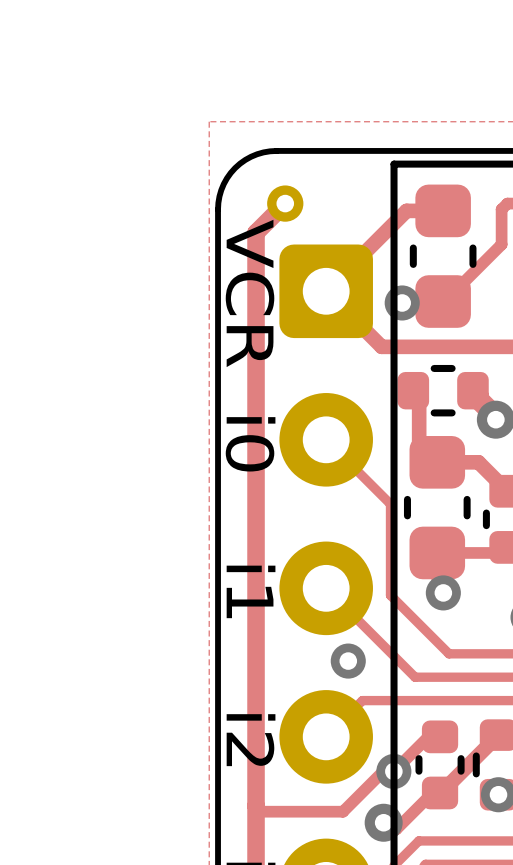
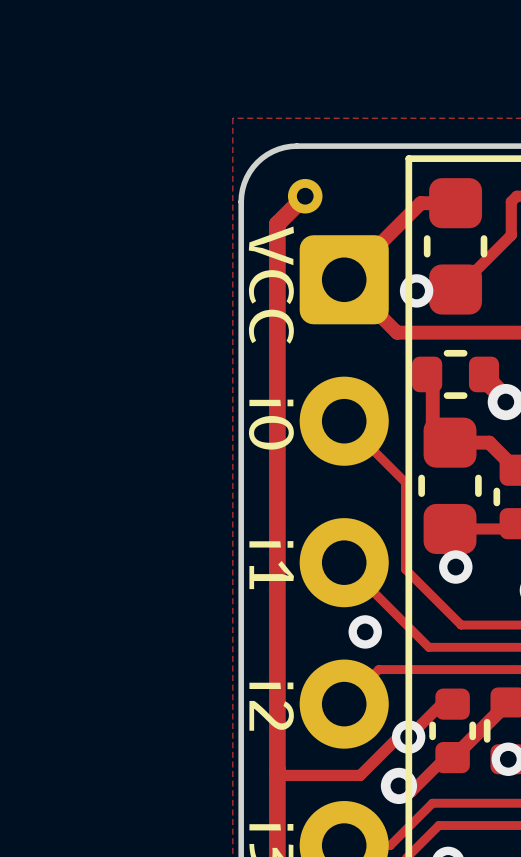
text: VCR (250, 293) -> VCC (271, 285)

